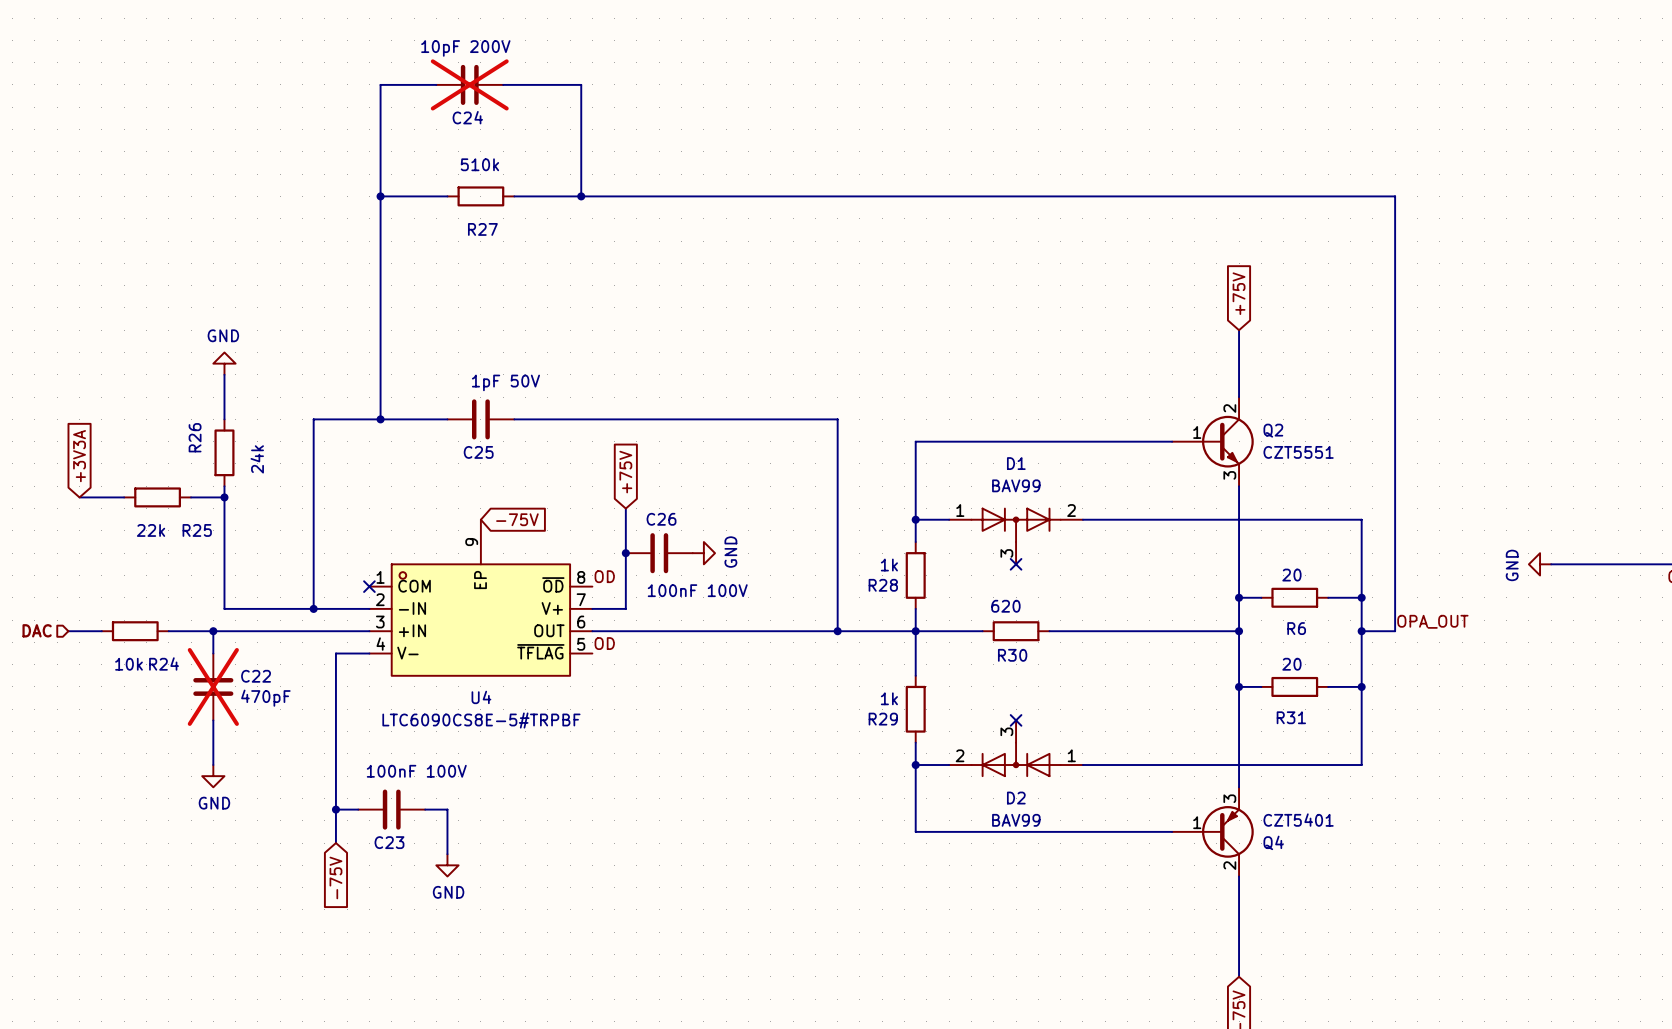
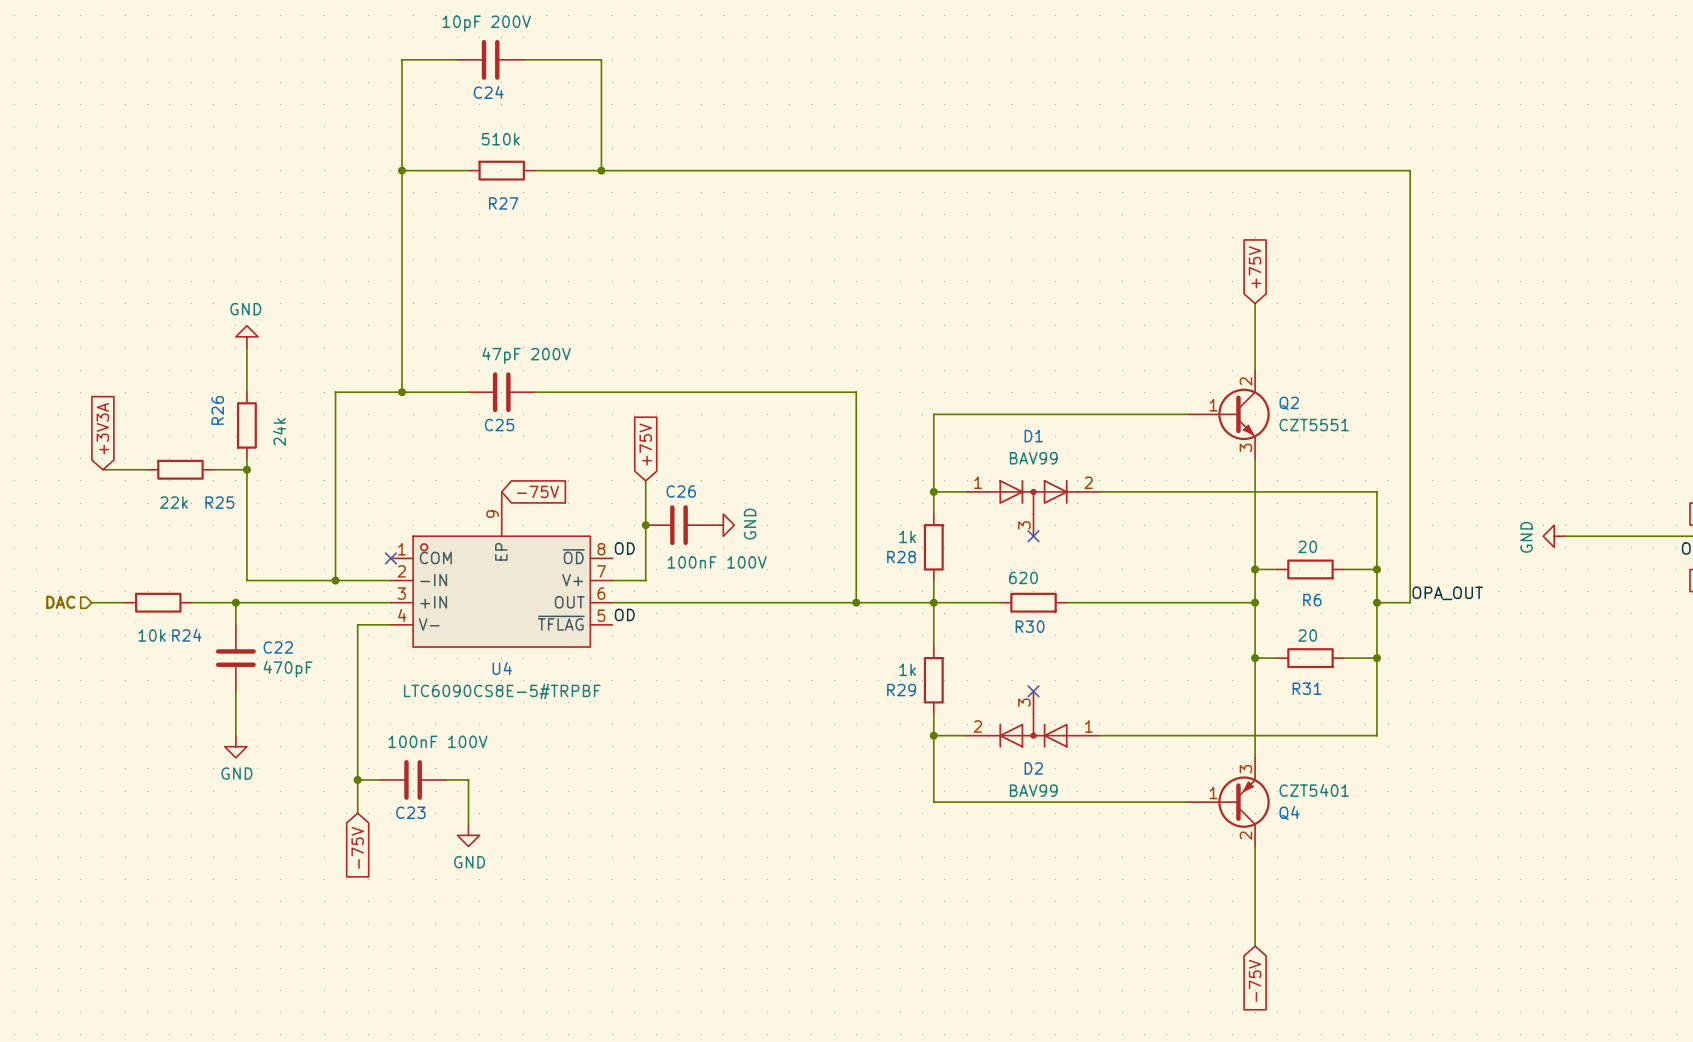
C24 do-not-place cross: (469, 84) -> none
C25 value: 1pF 50V (505, 382) -> 47pF 200V (526, 355)
C22 do-not-place cross: (213, 686) -> none

